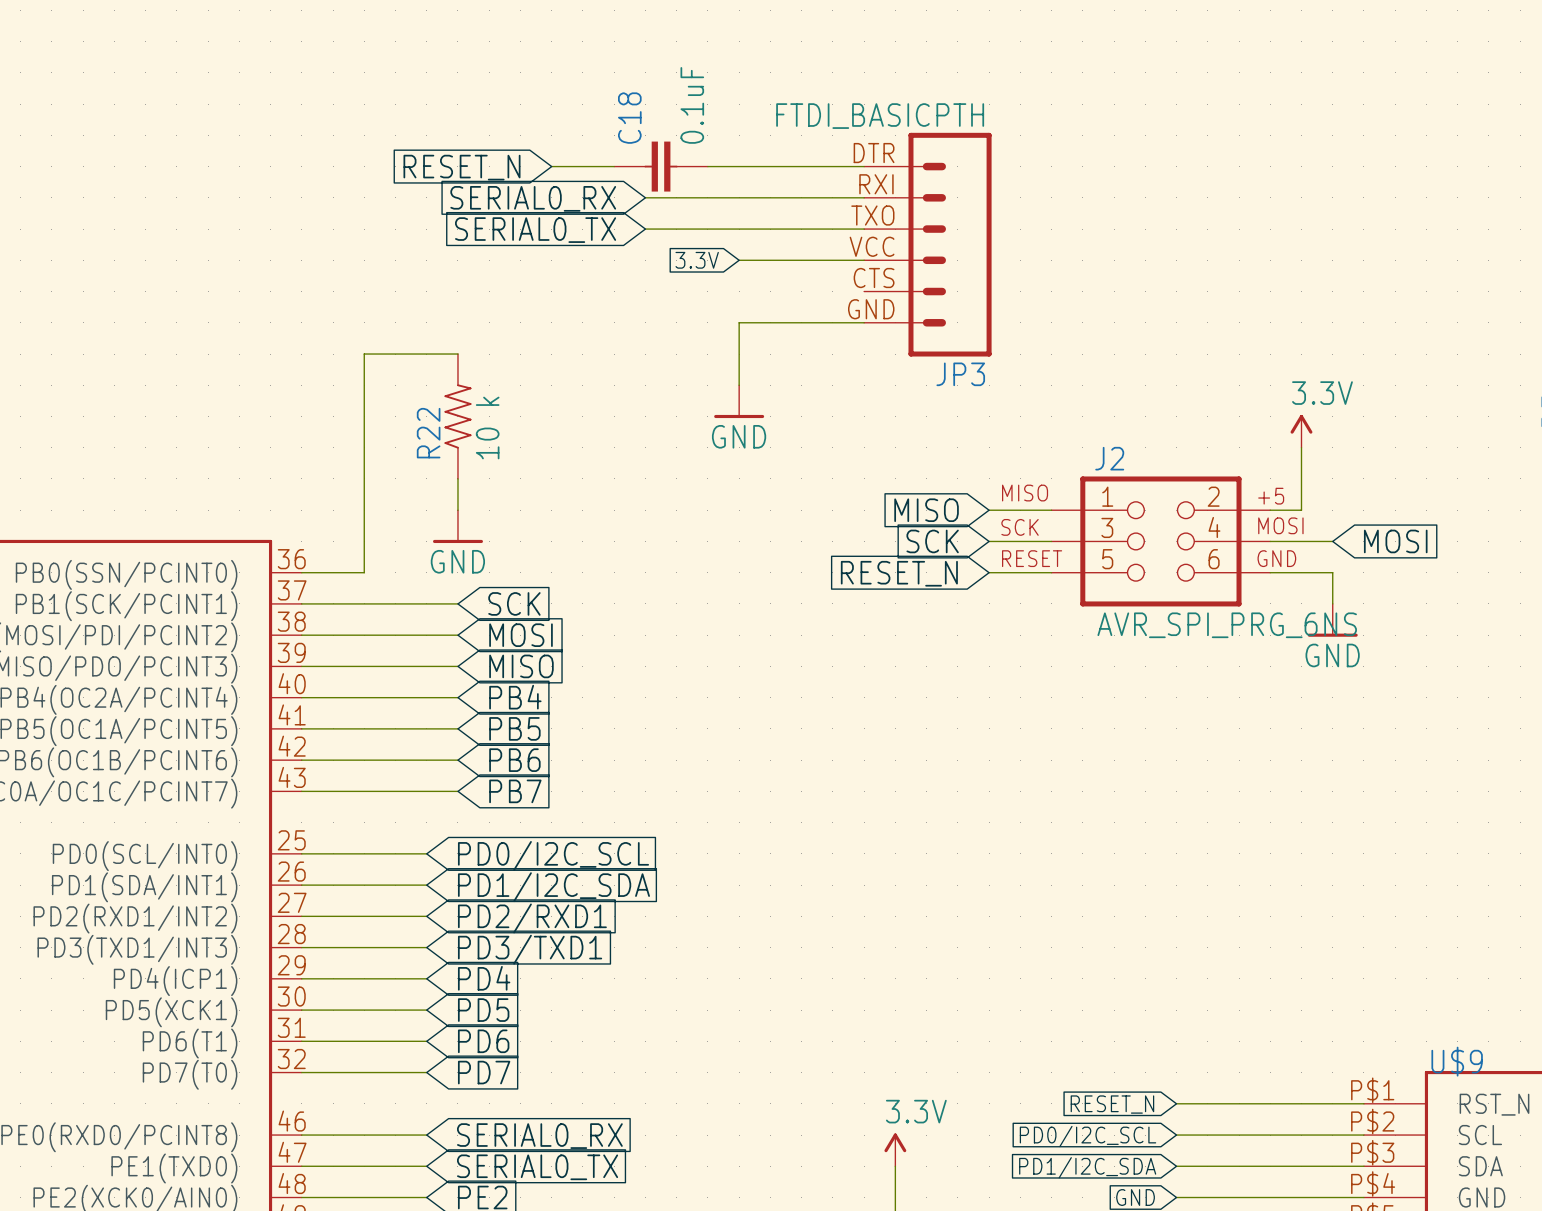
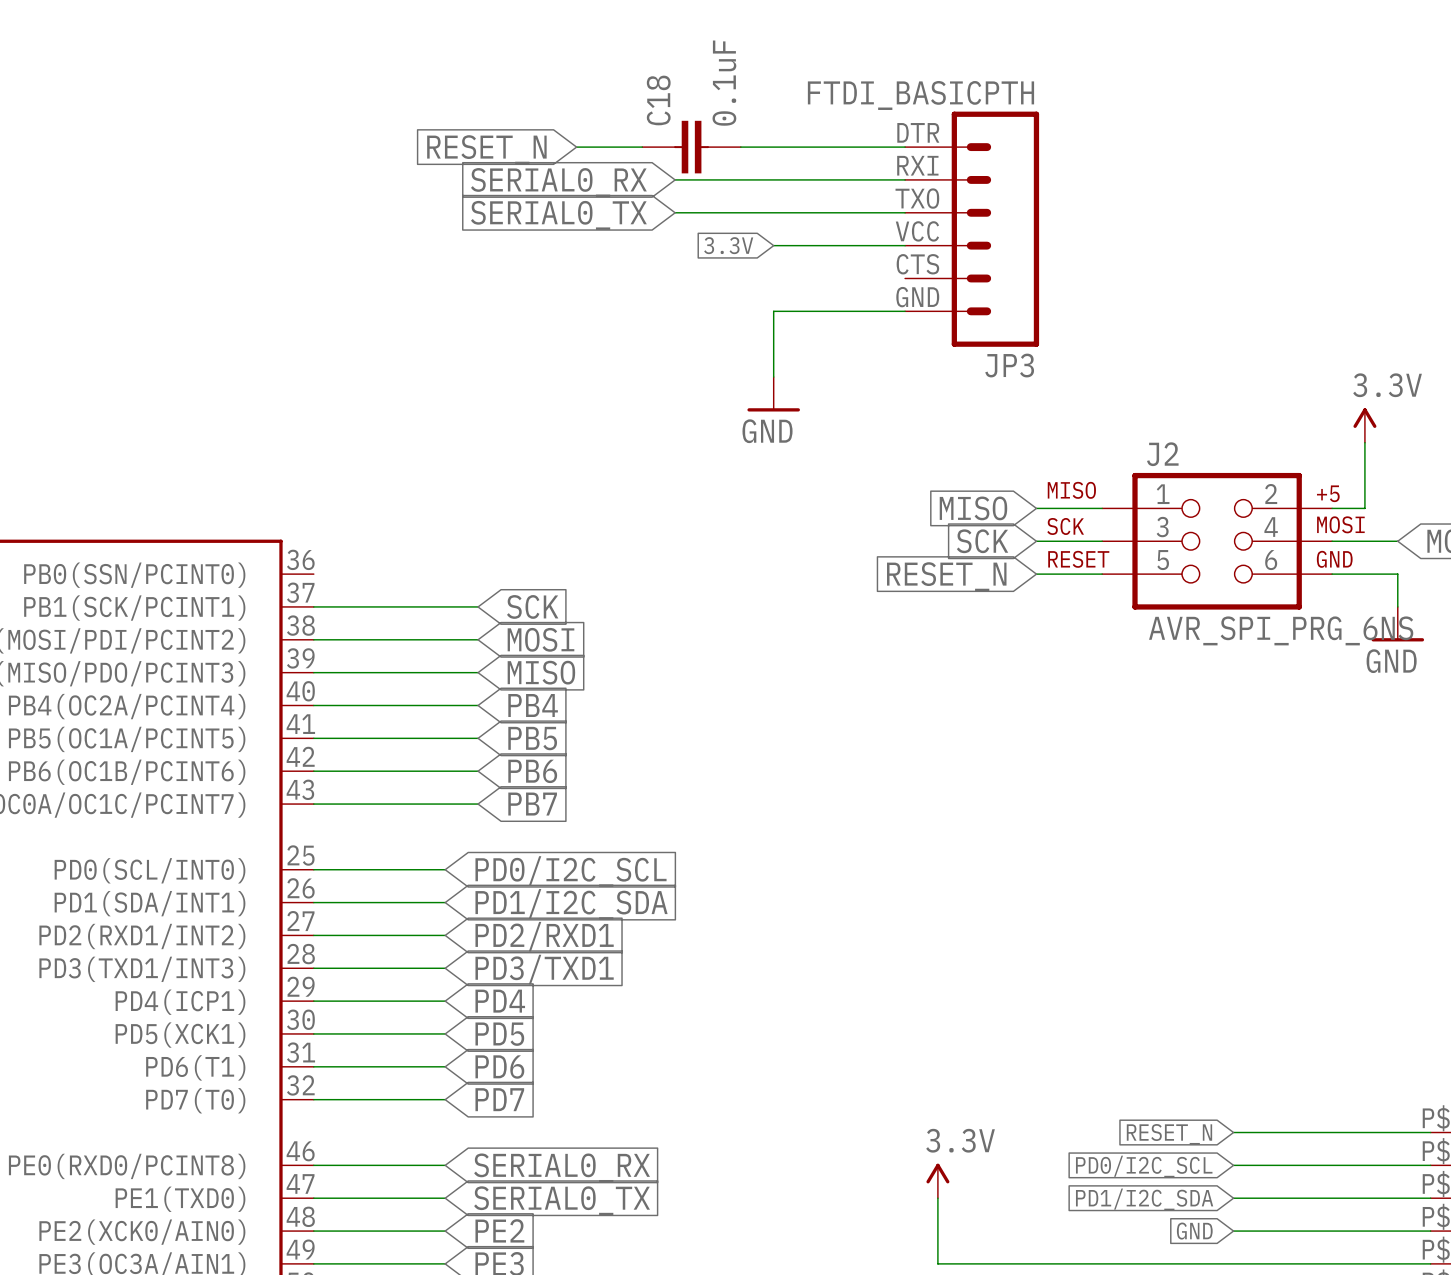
wire: (457, 354) (364, 354) (364, 572) (301, 572) -> none
R22: 10 k (457, 416) -> none
wire: (457, 478) (457, 510) -> none
power symbol: GND (457, 526) -> none

